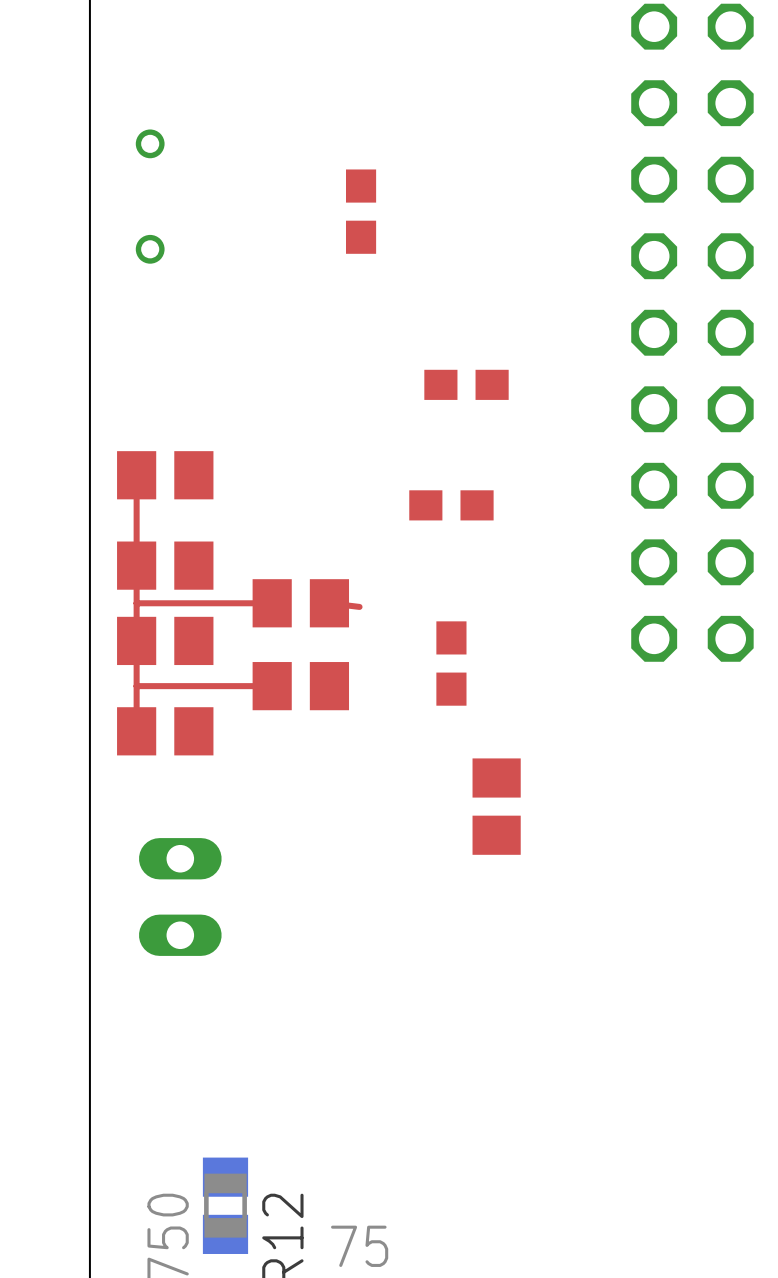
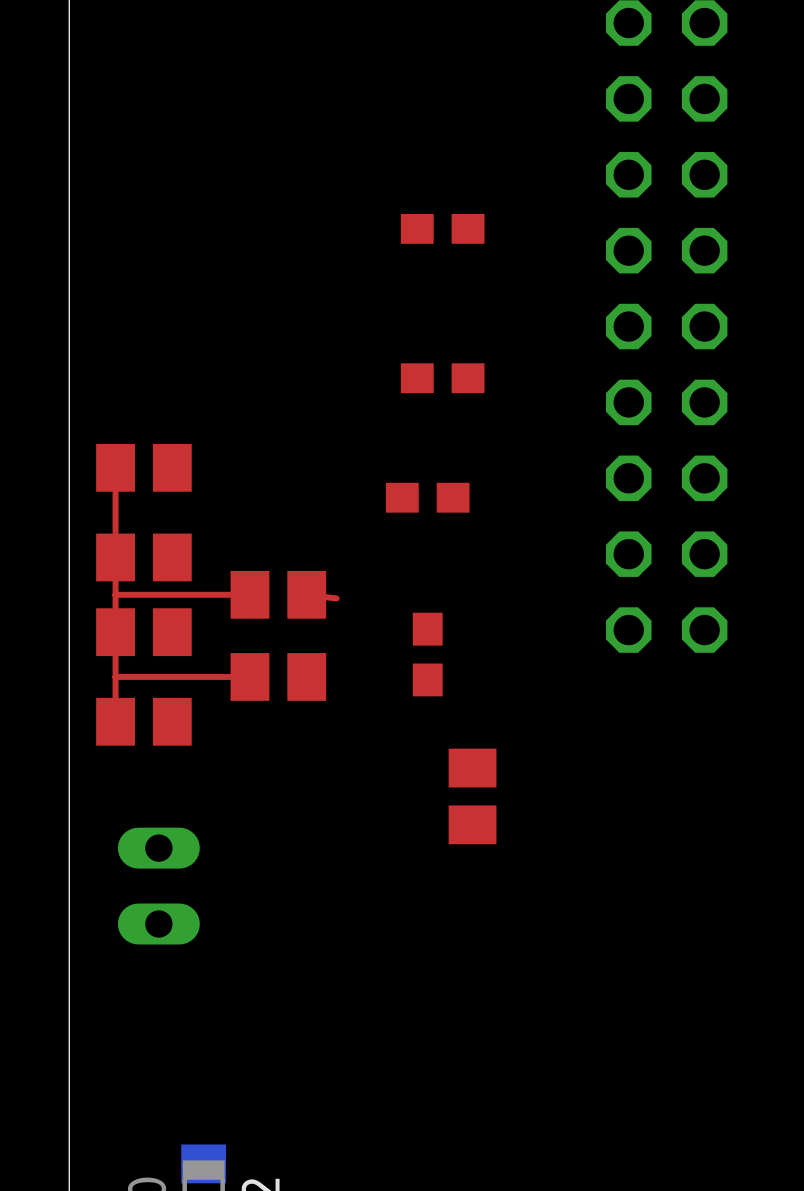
via: (150, 143) -> none
part rotation: 0° (361, 211) -> 90° clockwise (442, 228)
part position: (361, 211) -> (442, 228)
via: (150, 249) -> none

